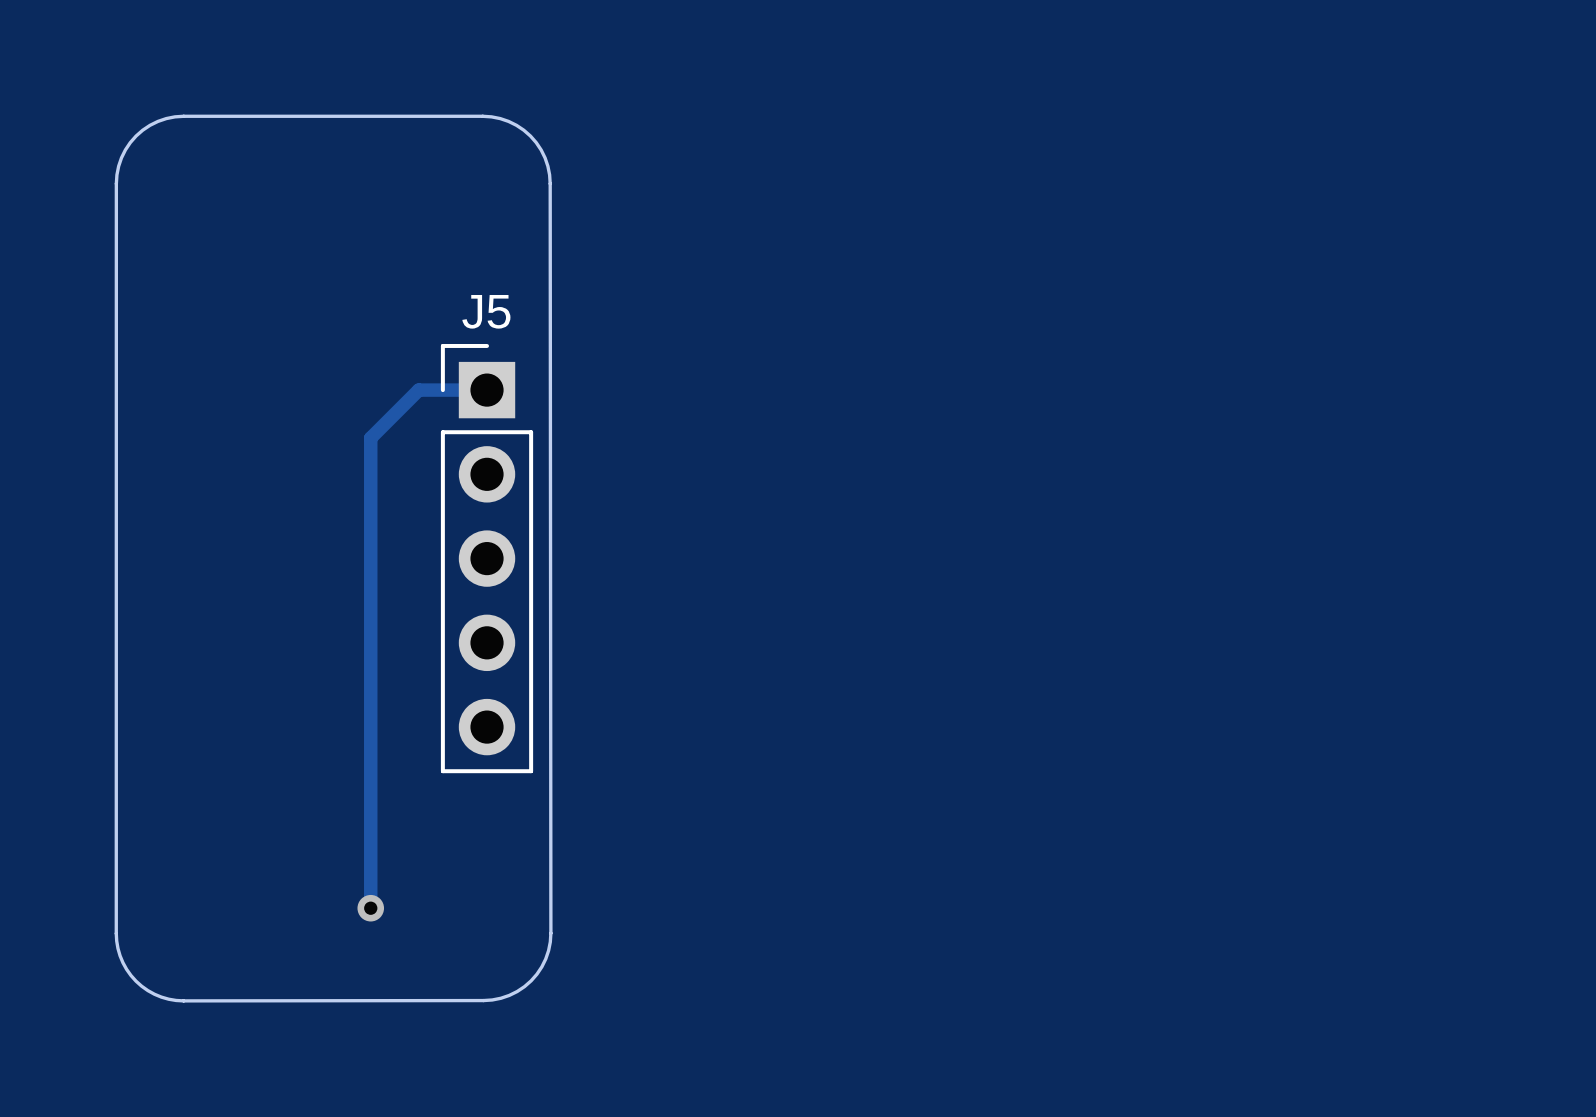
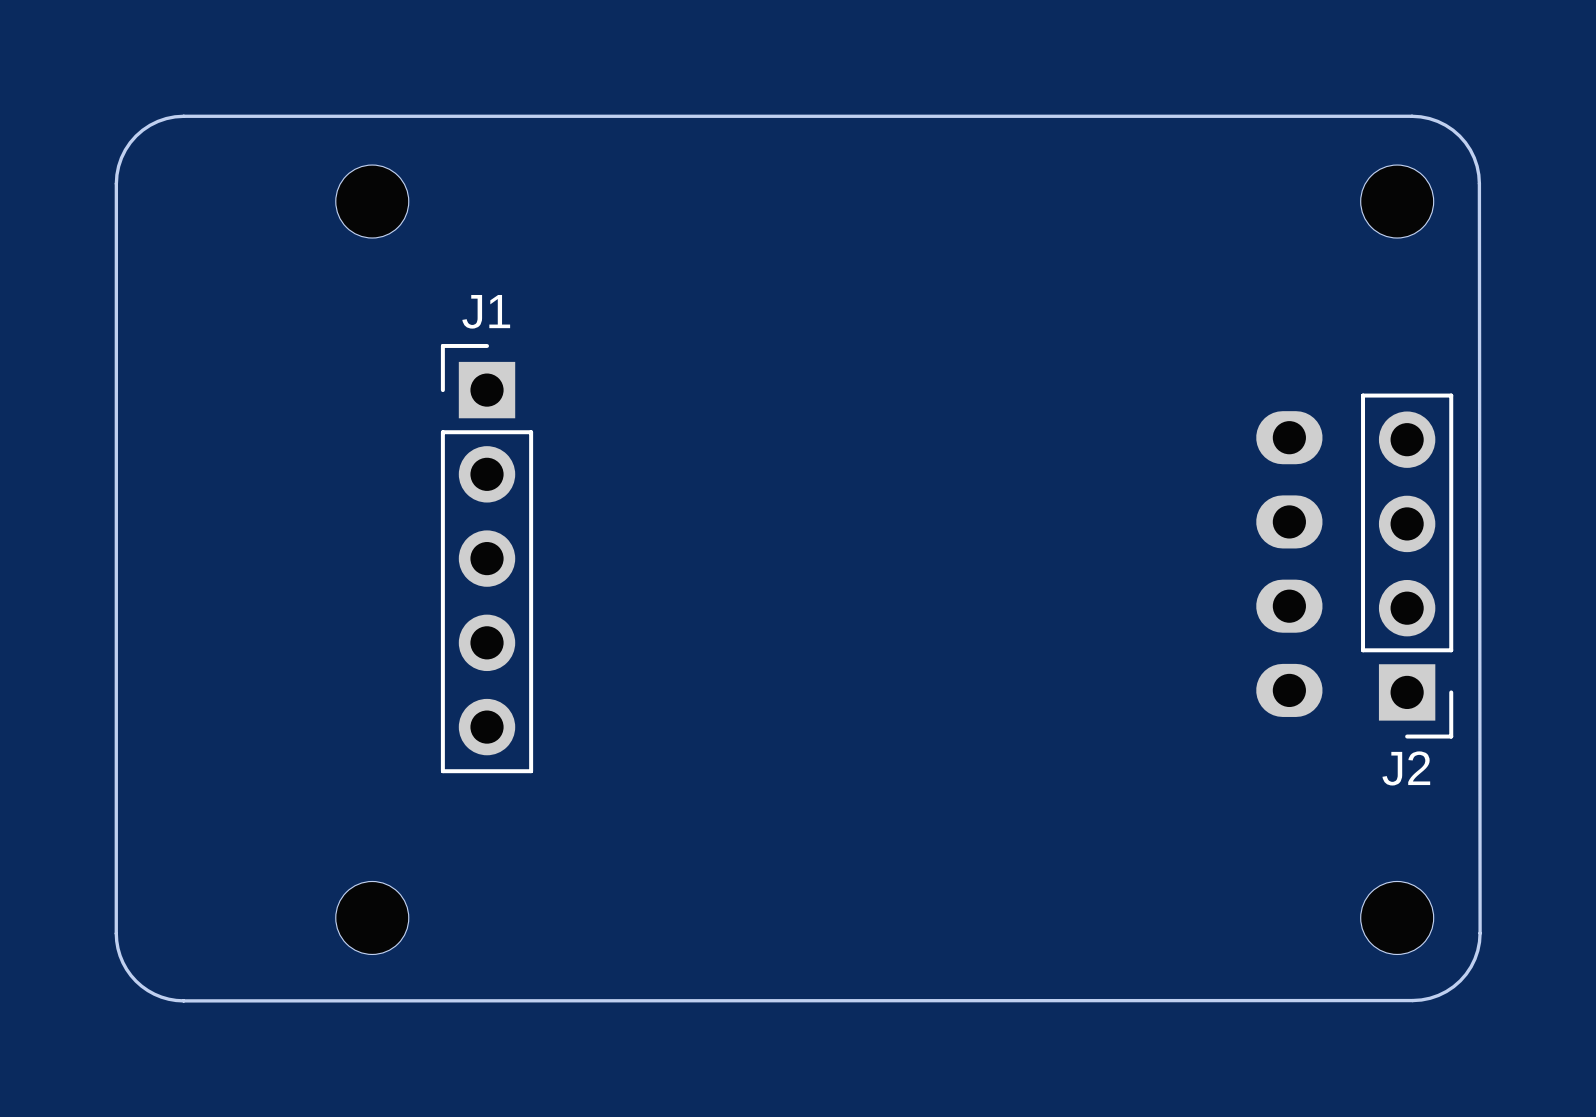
board edge: (482, 116) (508, 121) (530, 136) (541, 149) (549, 174) (550, 933) (548, 950) (541, 966) (524, 986) (509, 995) (492, 999) (183, 1000) -> (482, 116) (1412, 116) (1437, 121) (1453, 130) (1470, 149) (1477, 166) (1479, 183) (1480, 933) (1477, 950) (1471, 966) (1453, 986) (1430, 998) (1412, 1000) (183, 1000)
part: none -> (372, 201)
part: none -> (1397, 201)
J5 name: J5 (486, 311) -> J1 (486, 311)
track: (487, 390) (418, 390) (370, 438) (370, 908) -> none
part: none -> (1289, 564)
J2: none -> (1407, 566)
via: (370, 908) -> none
part: none -> (372, 917)
part: none -> (1397, 917)

